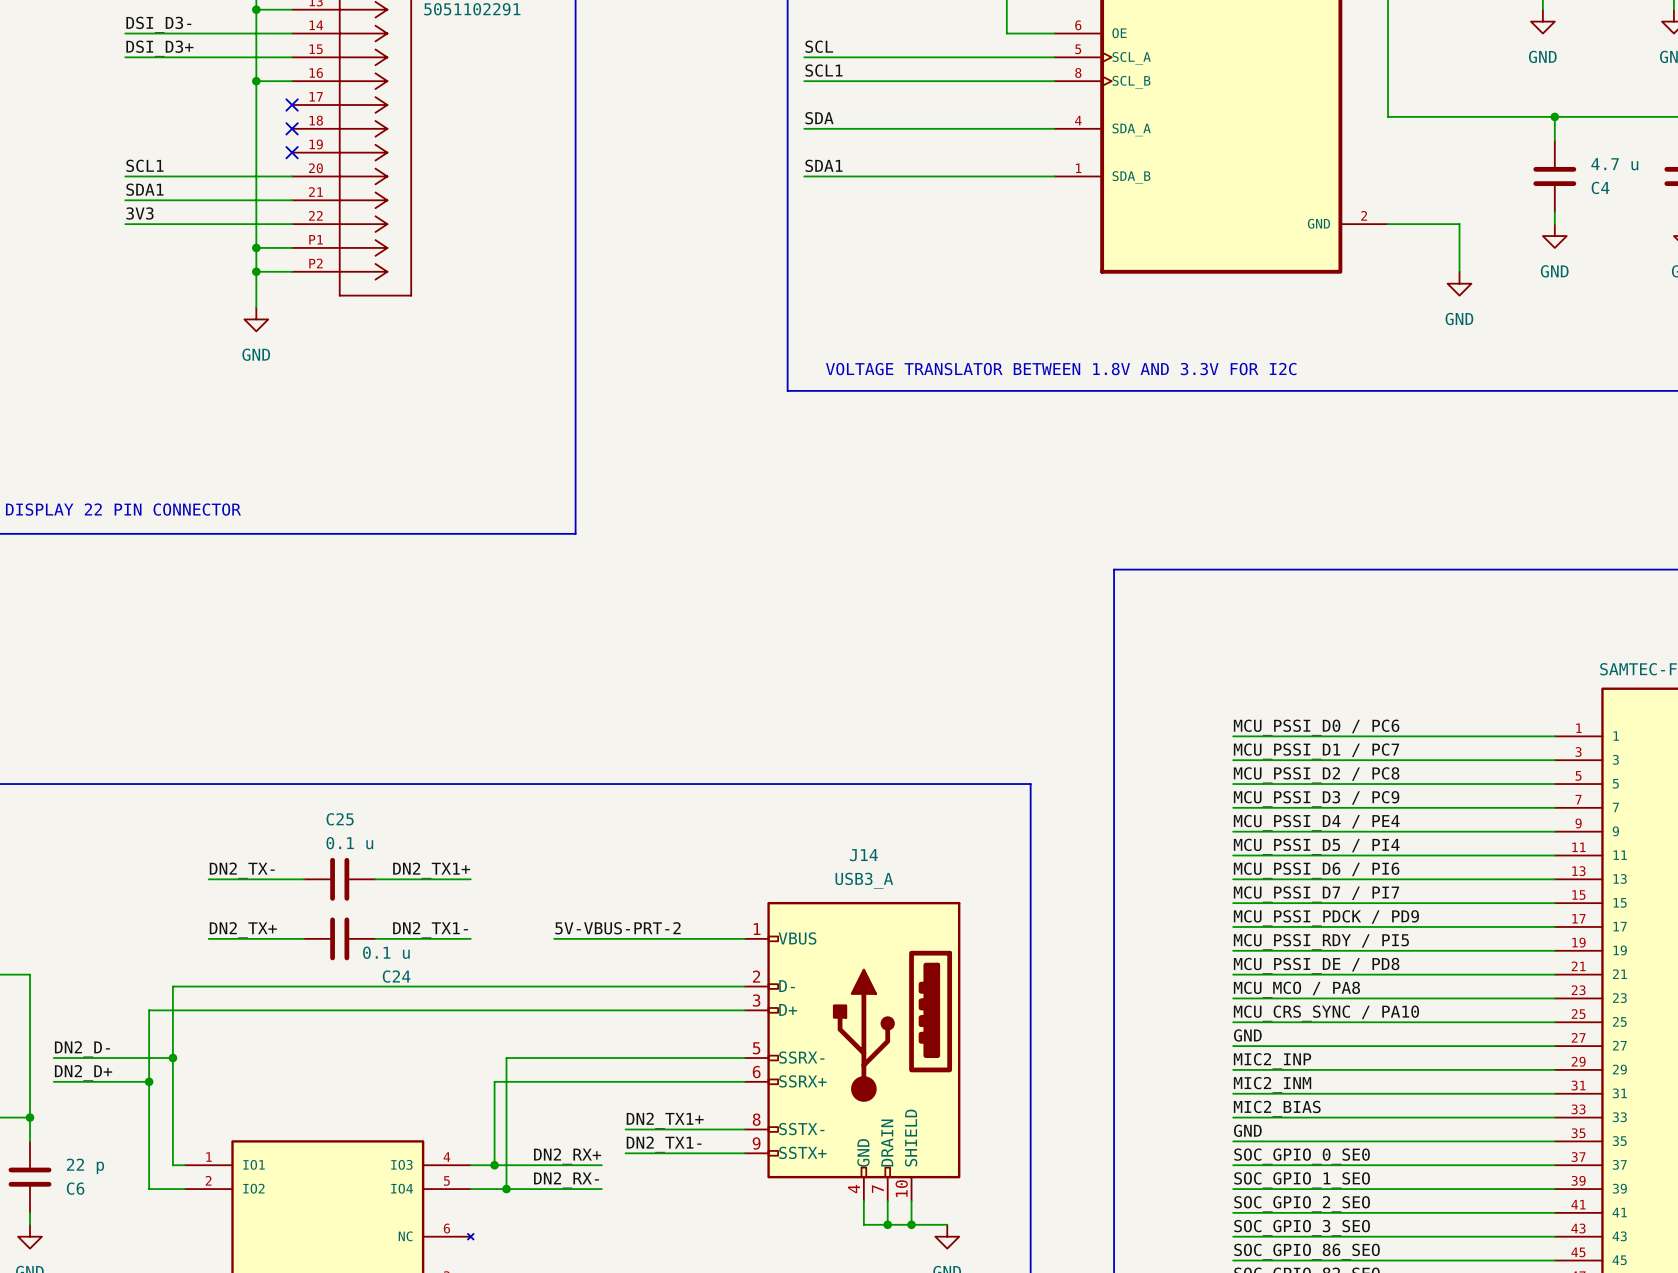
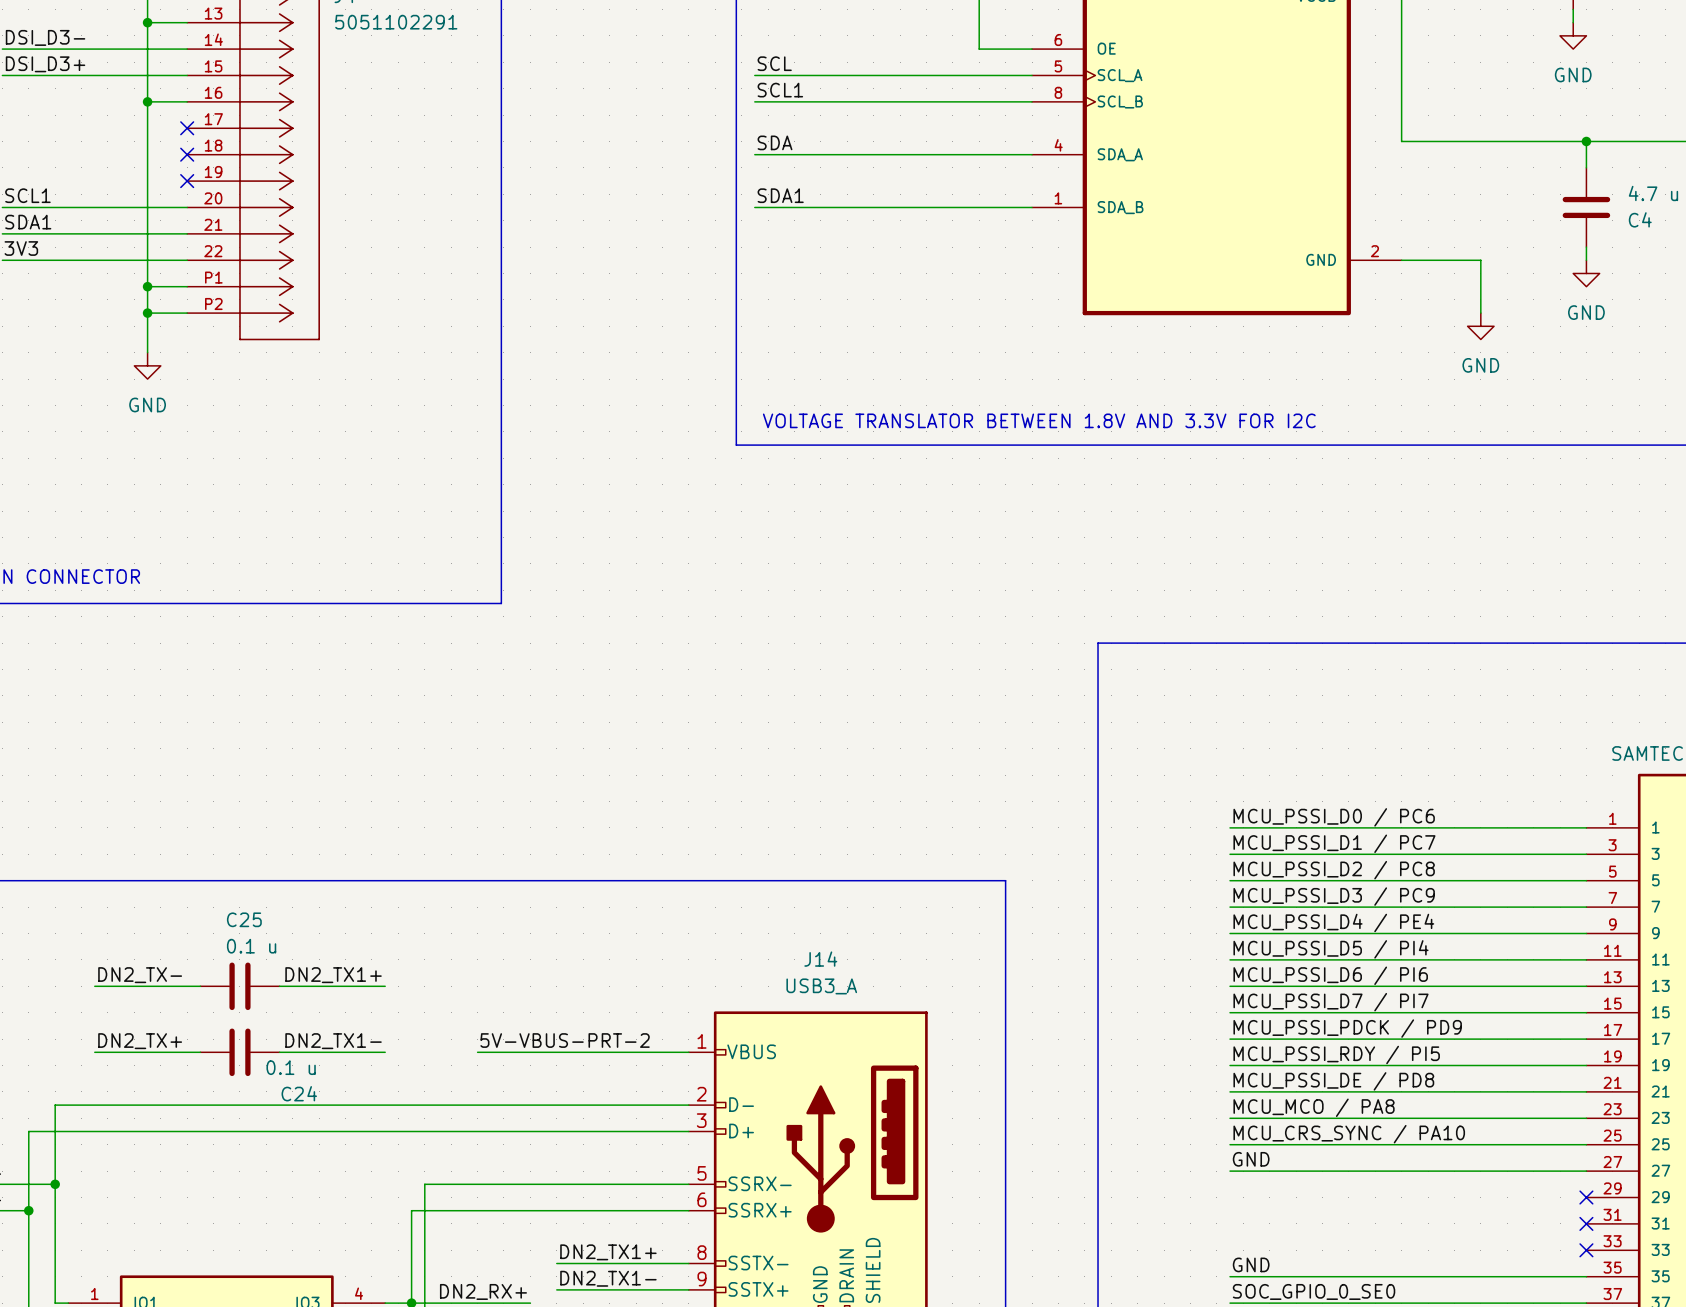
label: MIC2_INP (1272, 1061) -> none
wire: (1233, 1069) (1554, 1069) -> none
no-connect mark: none -> (1586, 1197)
label: MIC2_INM (1272, 1084) -> none
wire: (1233, 1093) (1554, 1093) -> none
no-connect mark: none -> (1586, 1223)
label: MIC2_BIAS (1277, 1108) -> none
wire: (1233, 1117) (1554, 1117) -> none
no-connect mark: none -> (1586, 1250)

